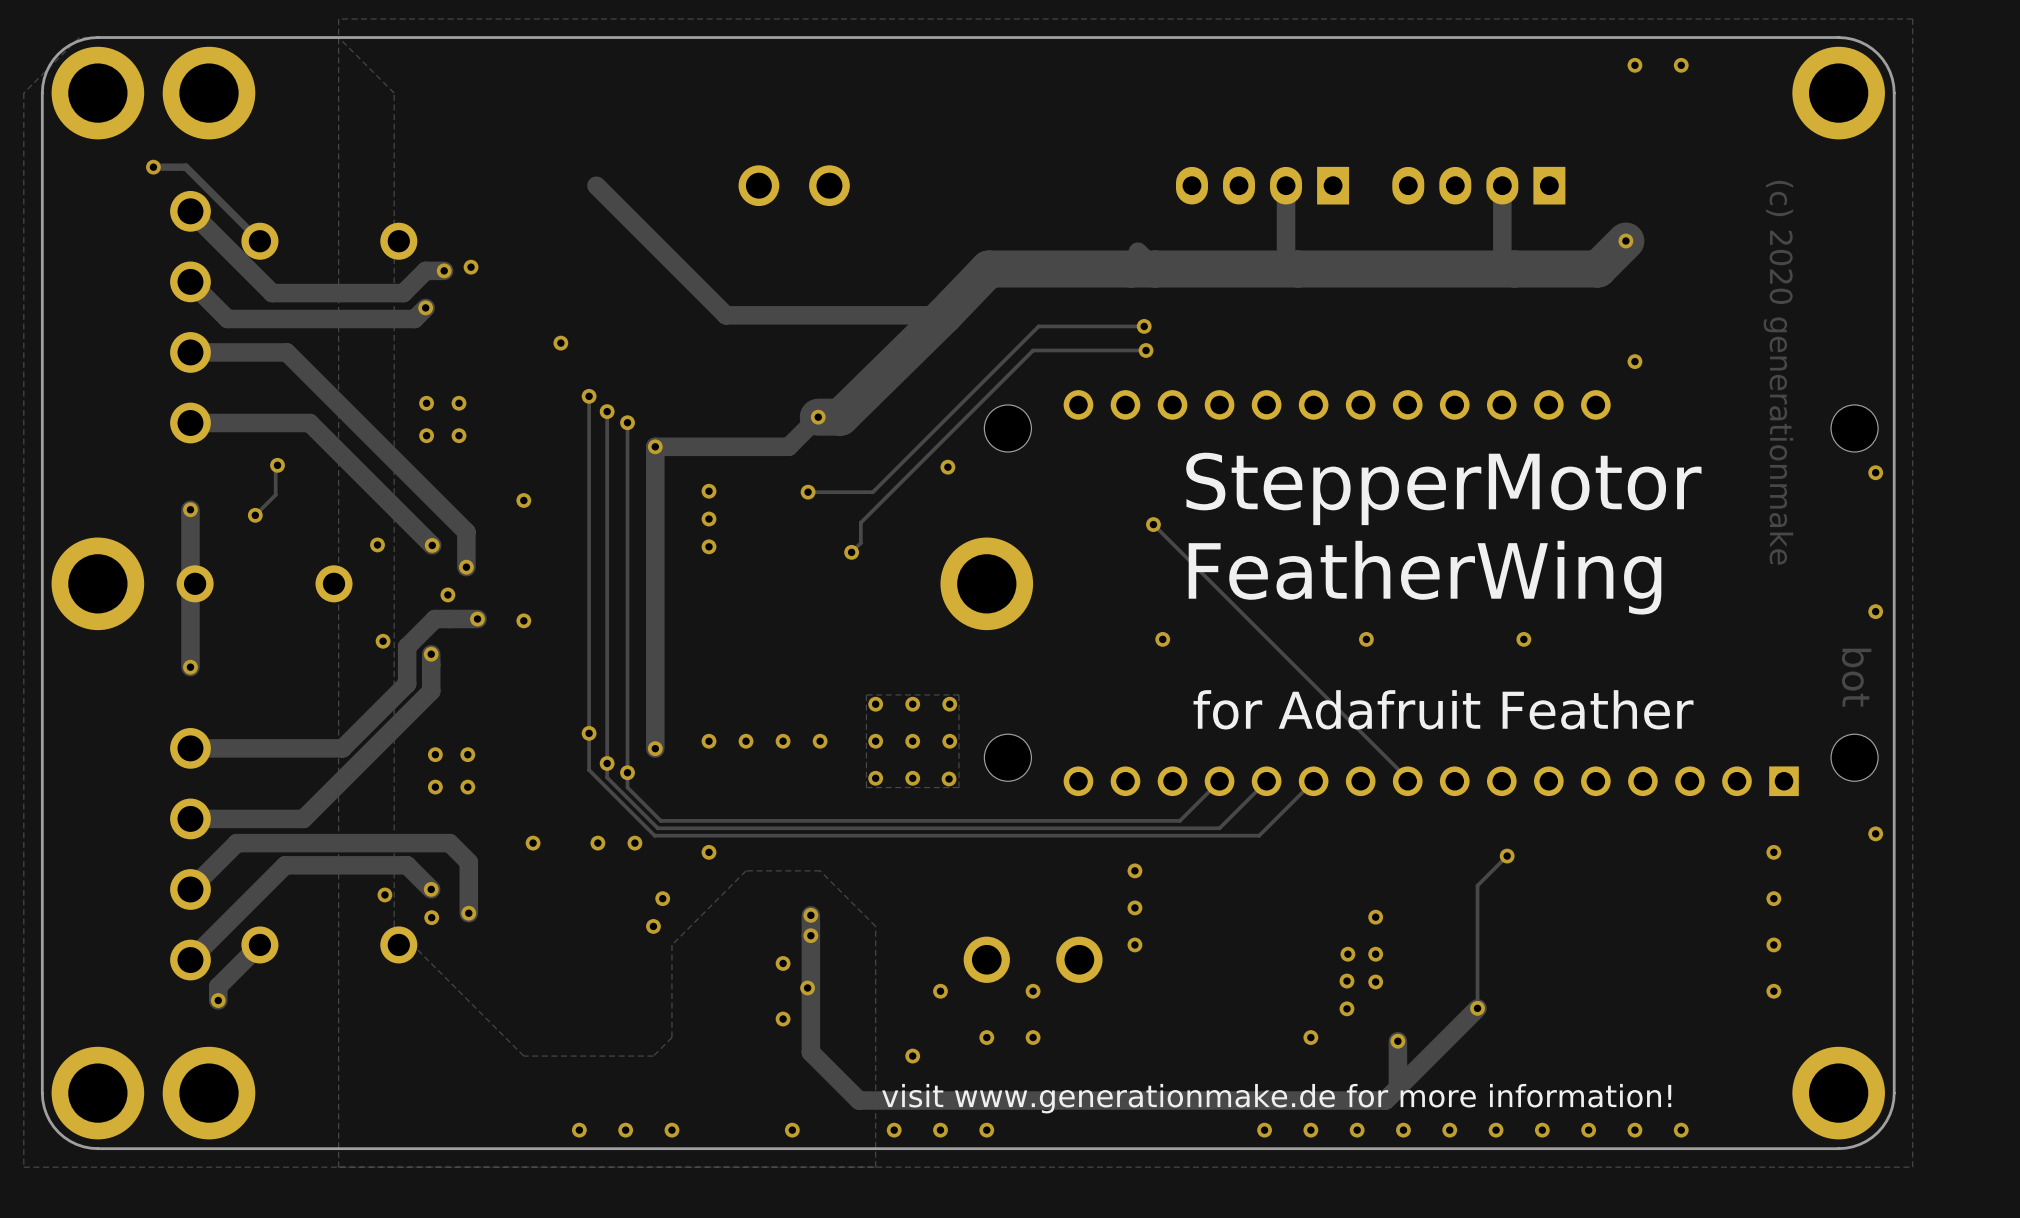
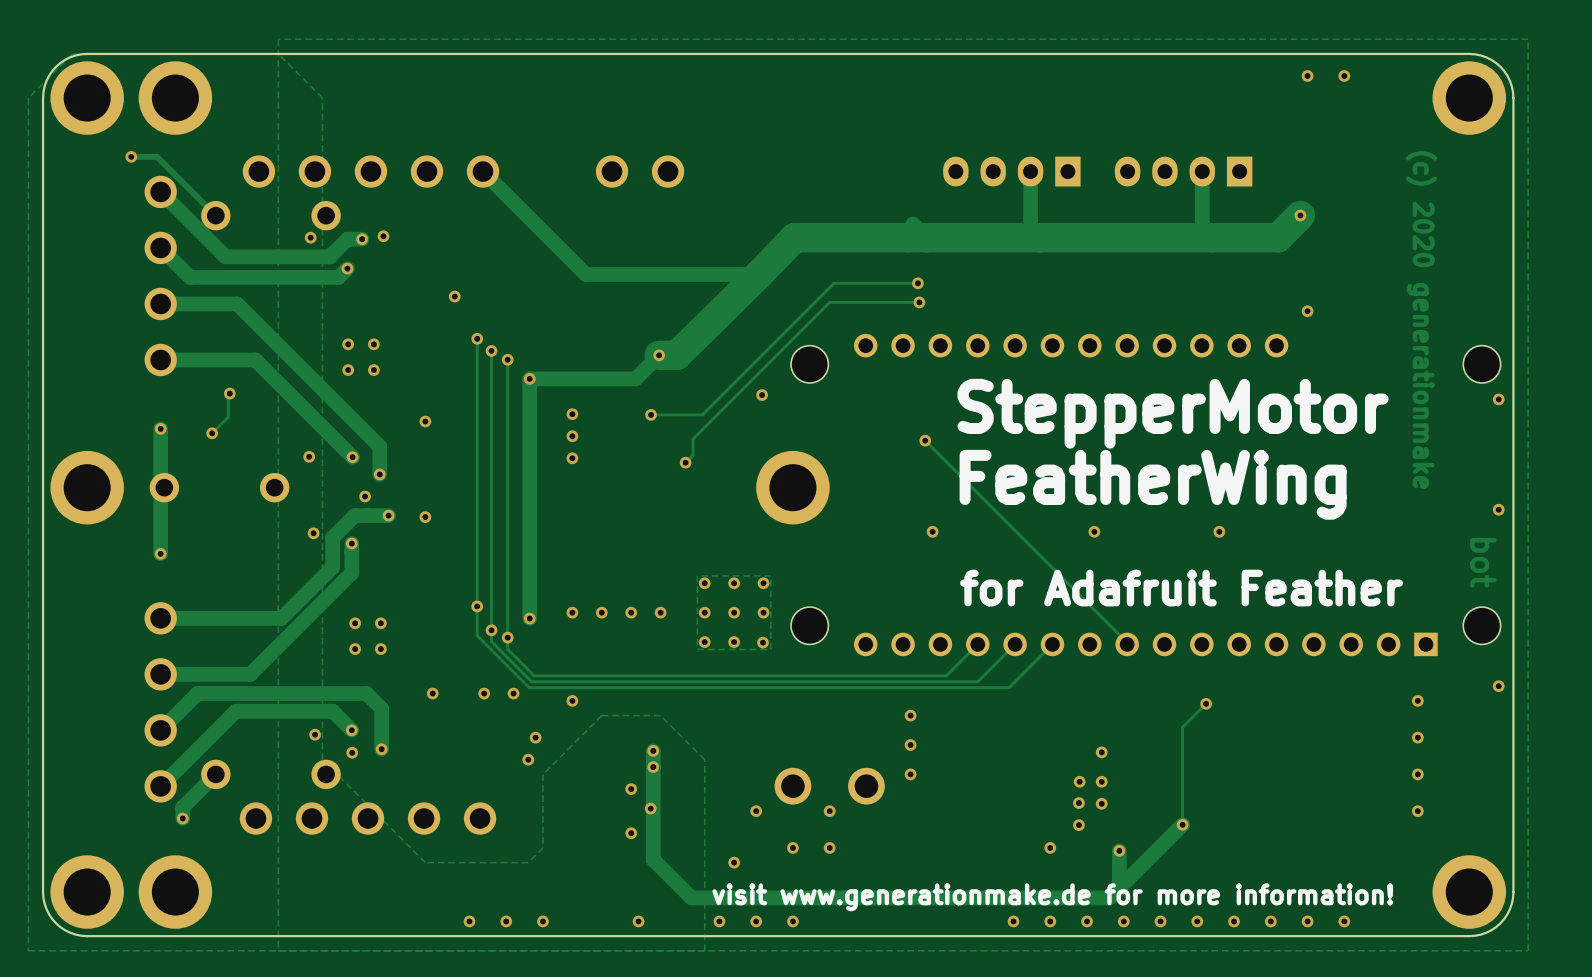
part: none -> (370, 171)
via: none -> (310, 237)
part: none -> (368, 818)

